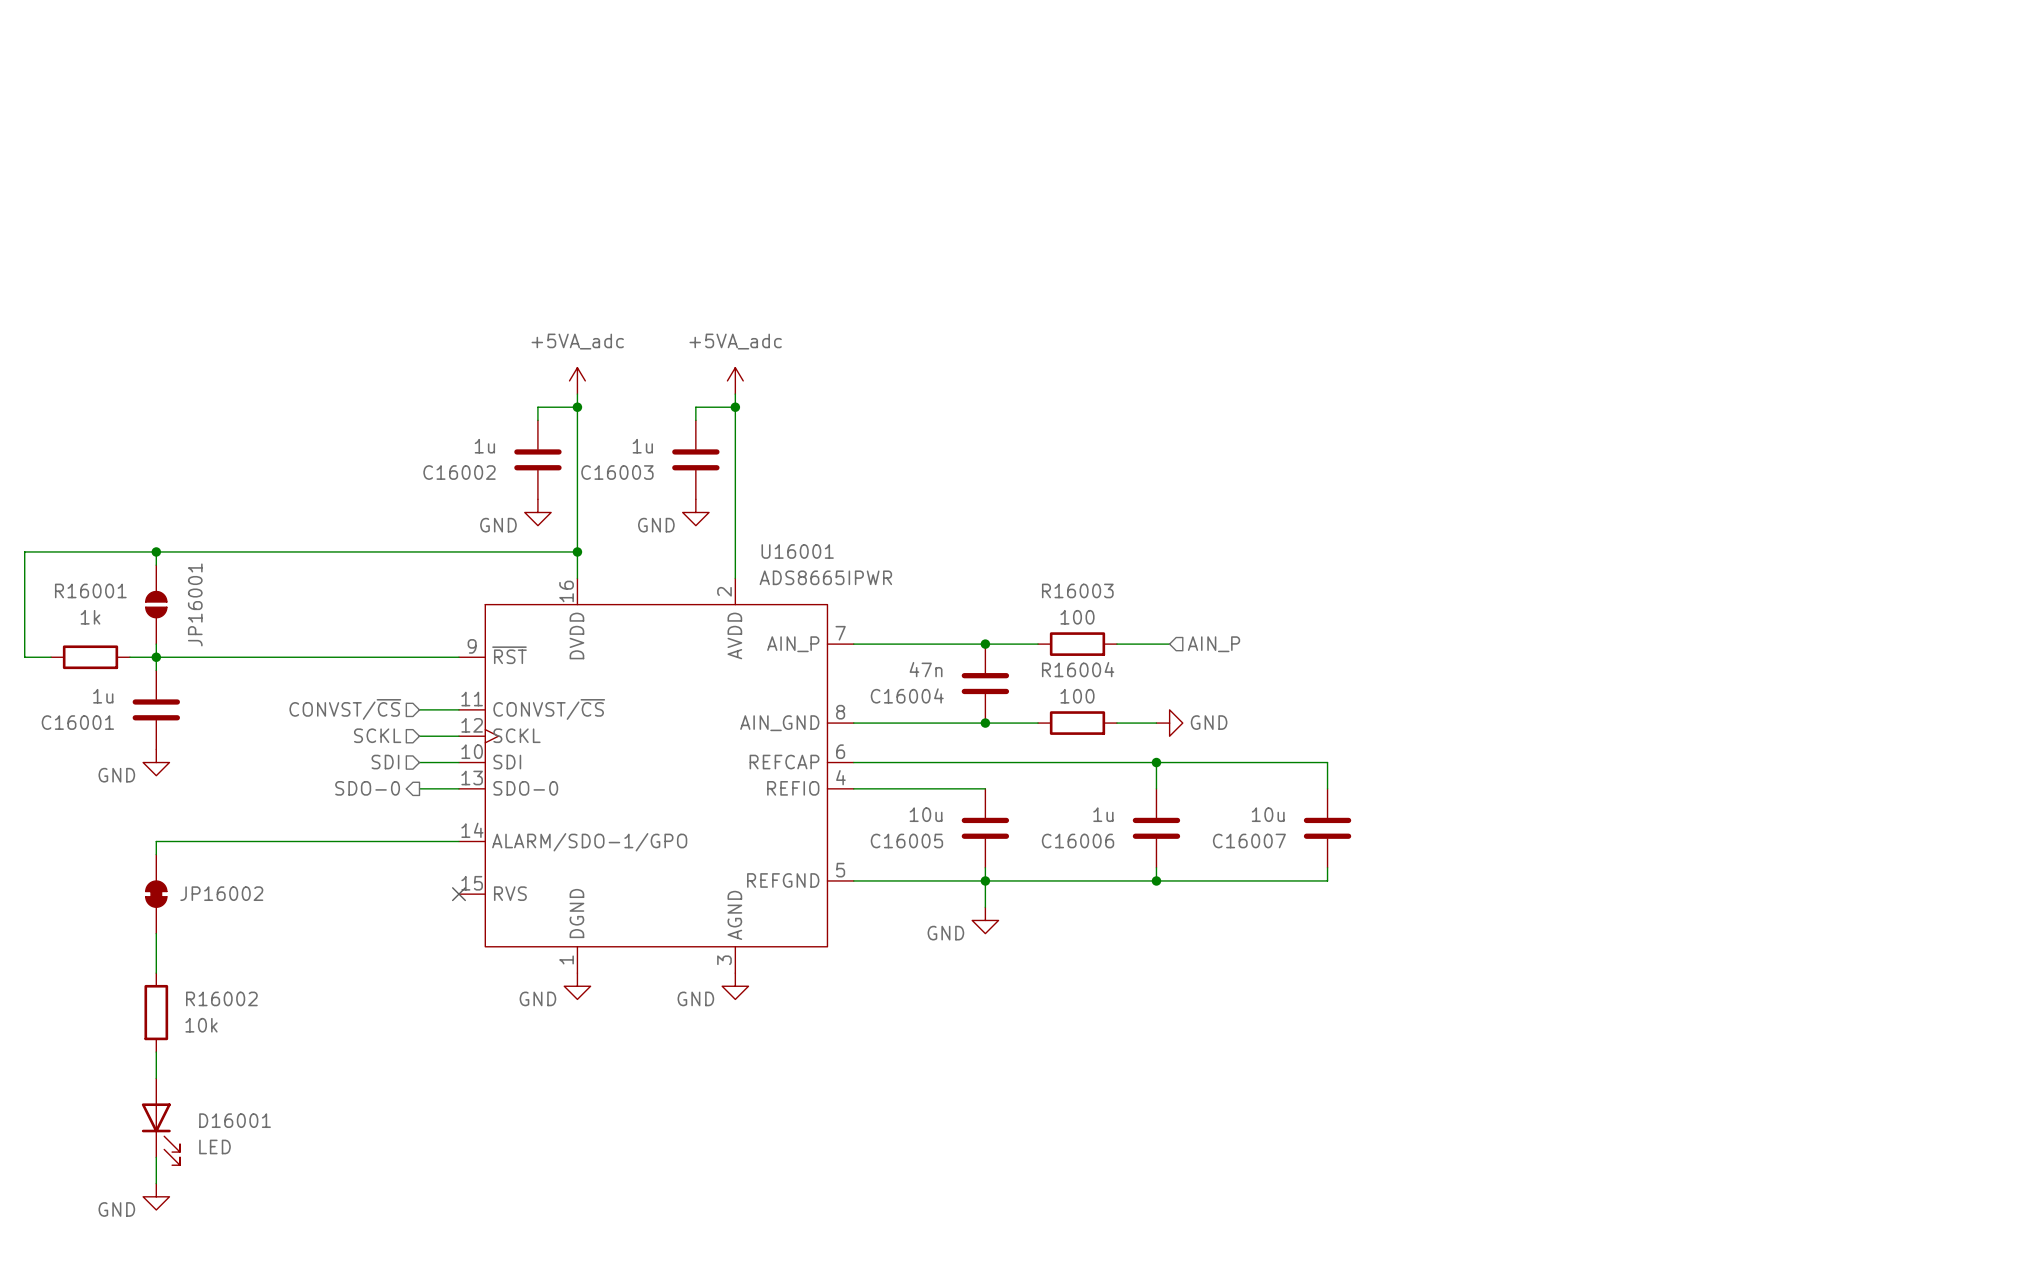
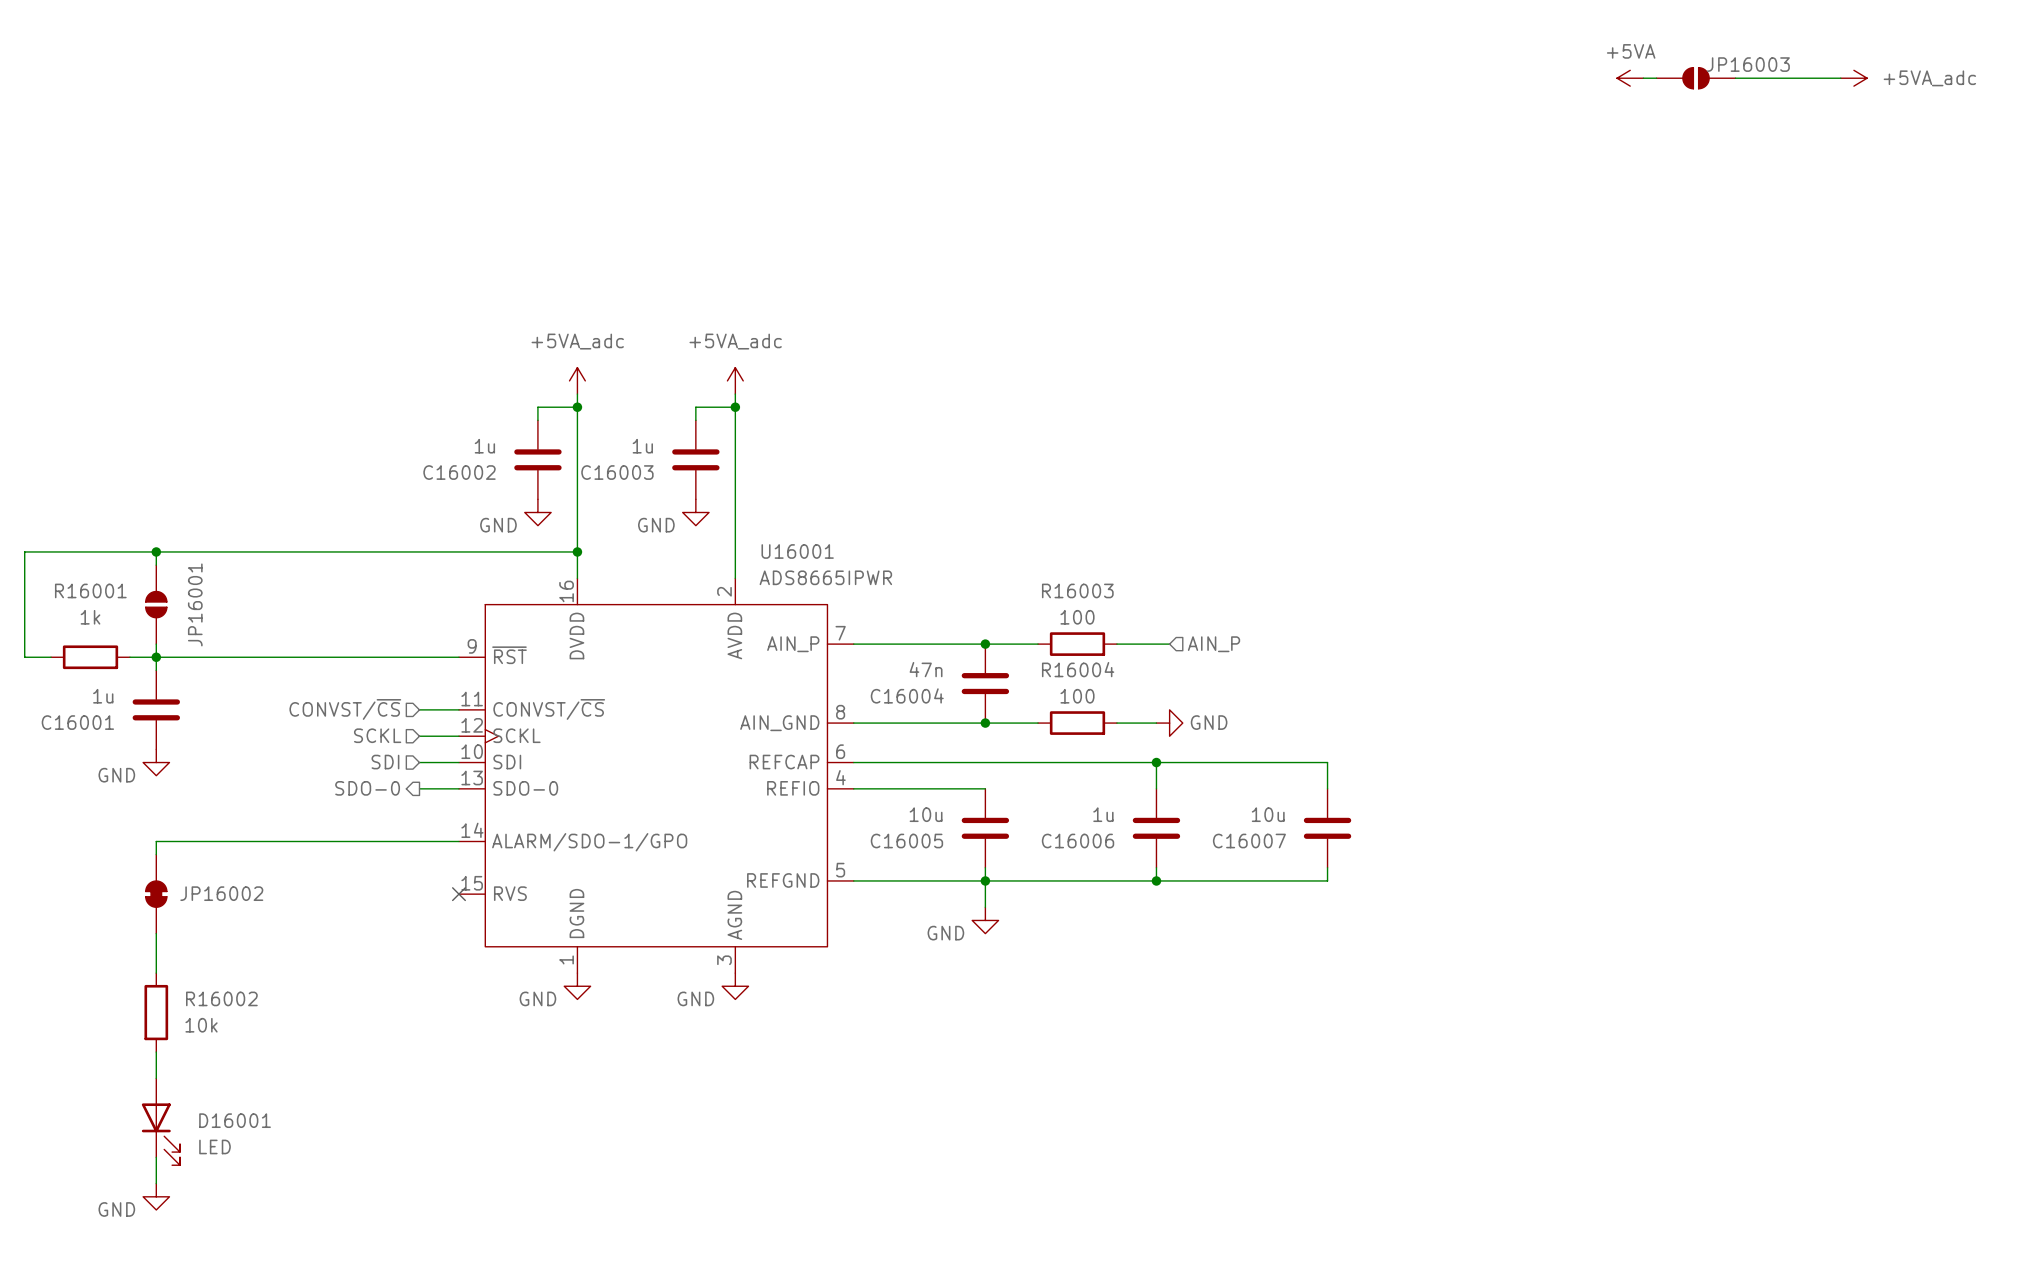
power symbol: none -> +5VA (1630, 78)
wire: none -> (1643, 78) (1656, 78)
JP16003: none -> (1696, 78)
wire: none -> (1735, 78) (1840, 78)
power symbol: none -> +5VA_adc (1853, 78)

